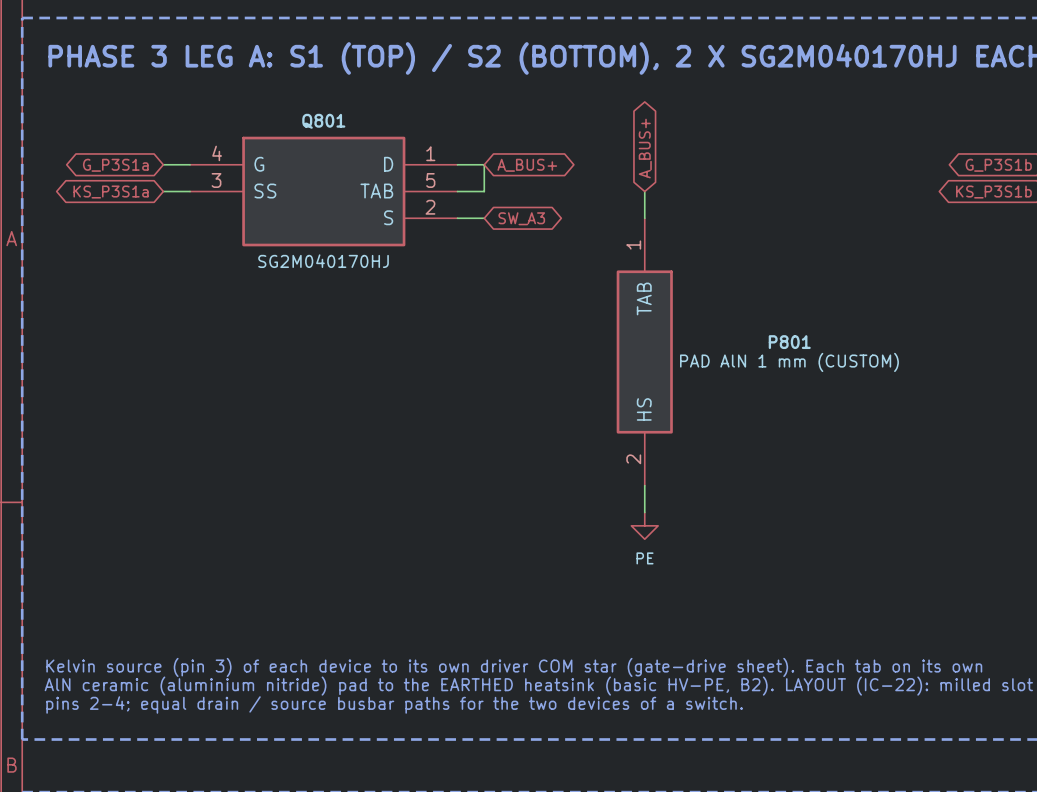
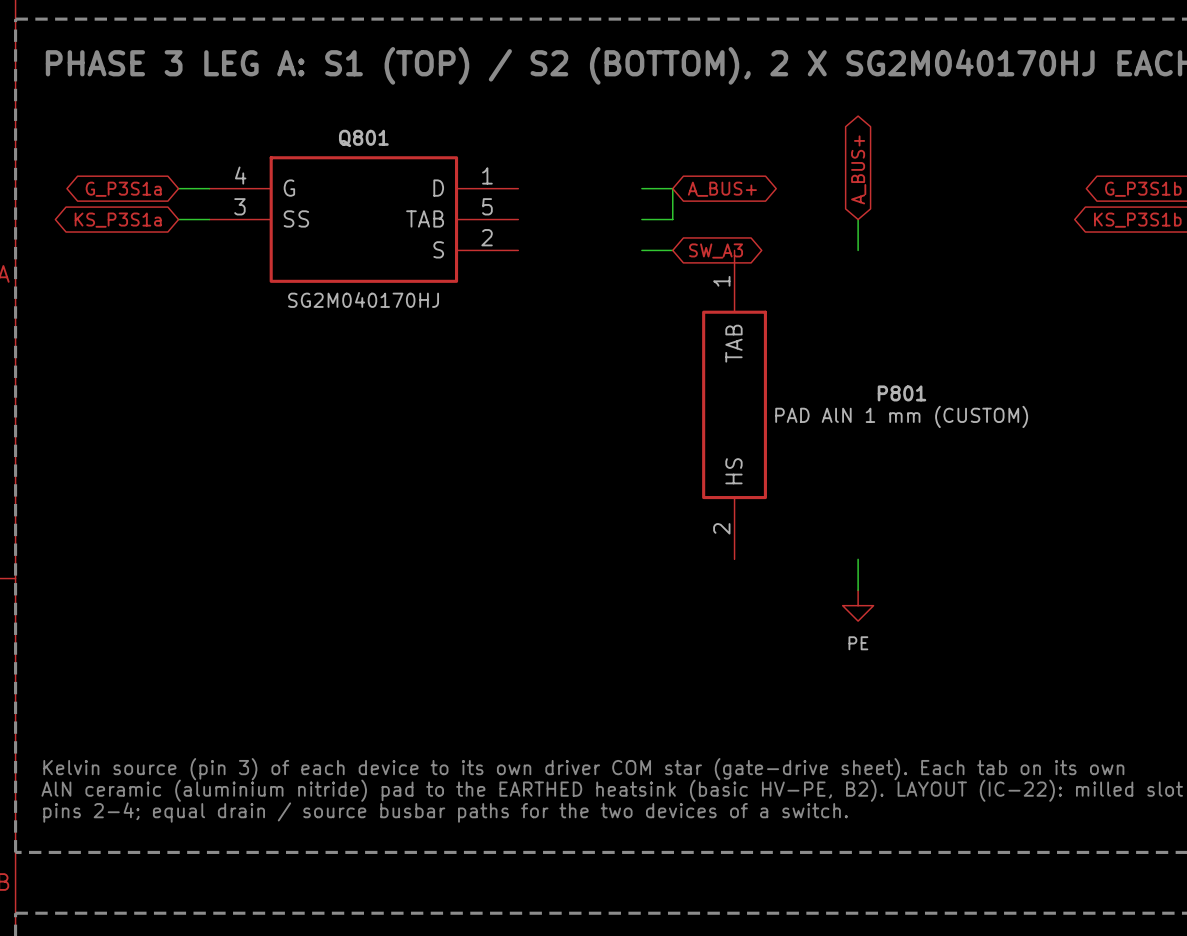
global label rotation: 0° (645, 148) -> 90° clockwise (722, 189)
global label: none -> A_BUS+ (858, 169)
wire: (457, 164) (484, 164) (484, 191) (457, 191) -> (641, 188) (672, 188) (672, 219) (641, 219)
global label: A_BUS+ (527, 165) -> none
wire: (644, 191) (644, 218) -> (858, 219) (858, 250)
wire: (457, 218) (484, 218) -> (641, 250) (672, 250)
global label position: SW_A3 (521, 218) -> SW_A3 (716, 251)
wire: (644, 485) (644, 512) -> (858, 559) (858, 590)
power symbol position: PE (644, 525) -> PE (858, 605)

